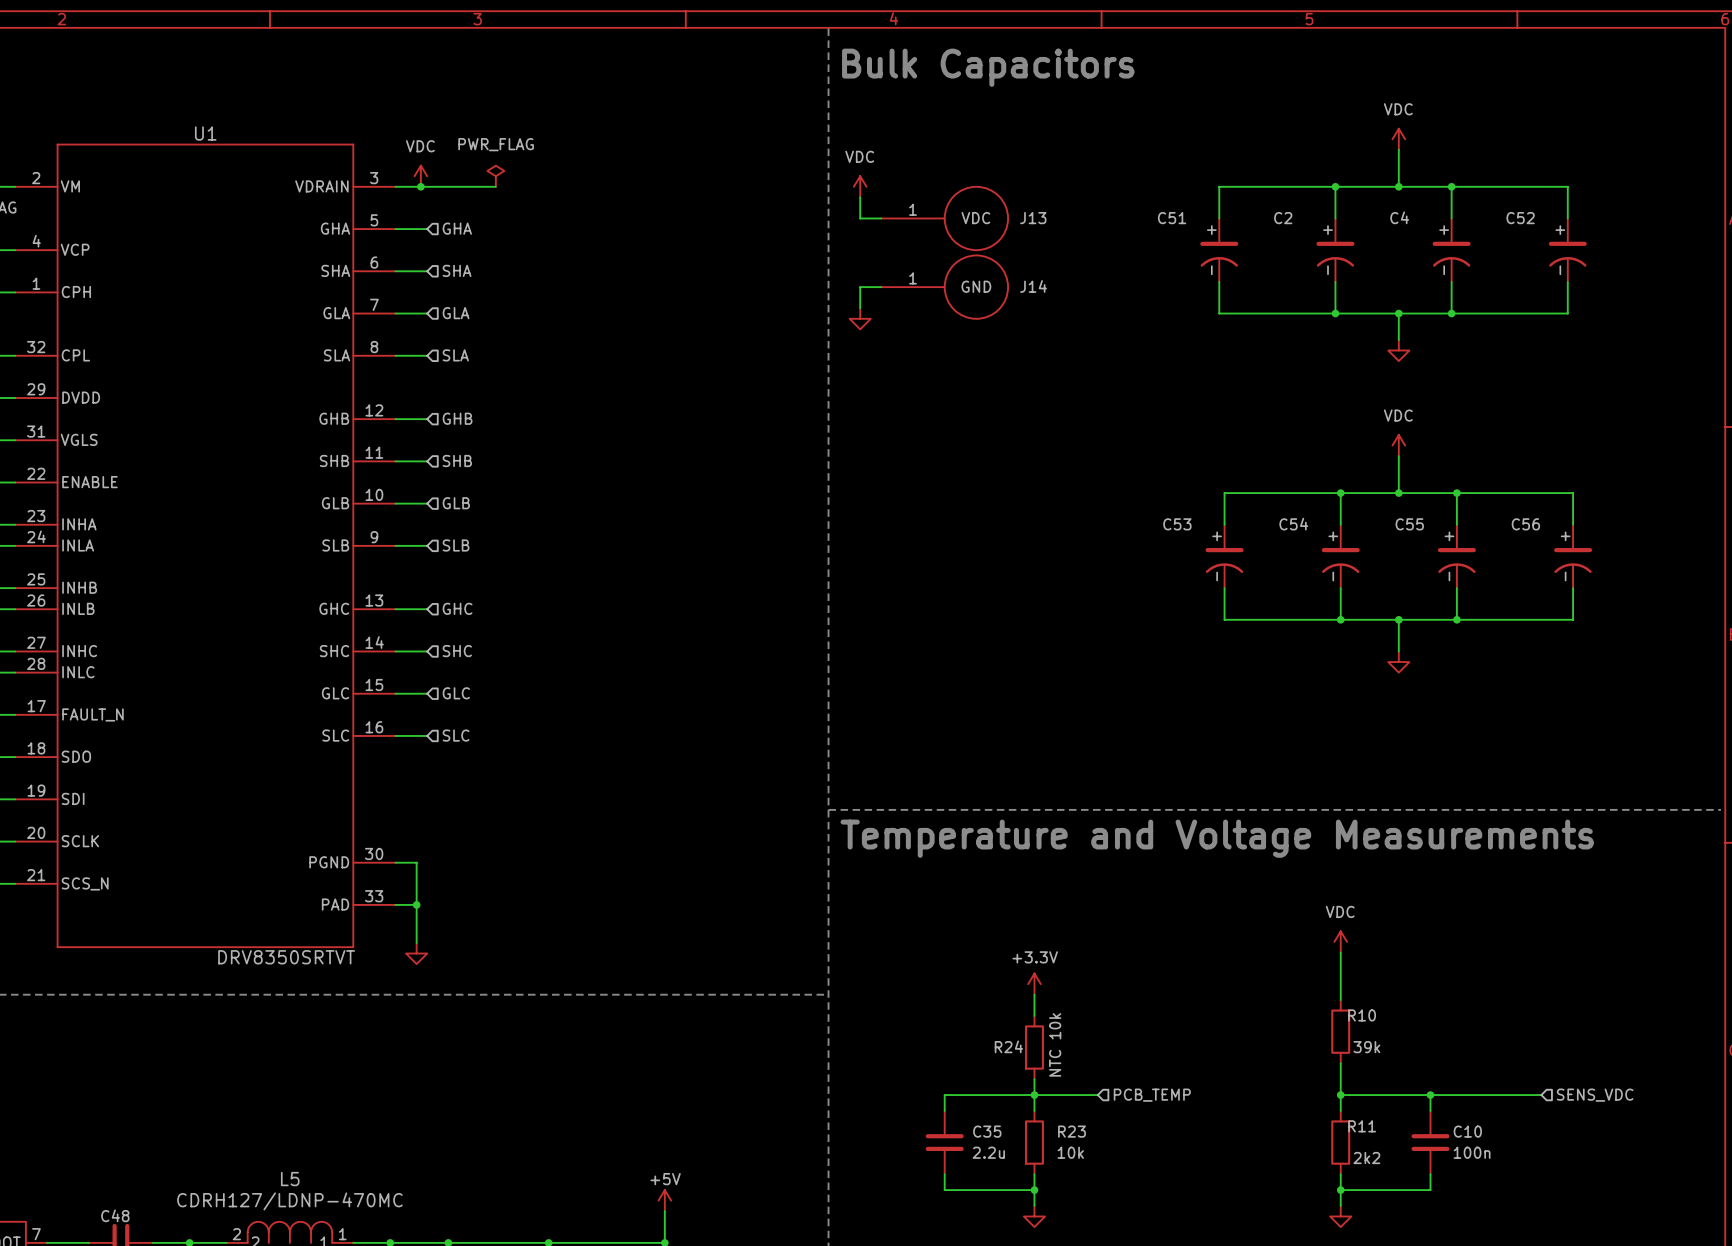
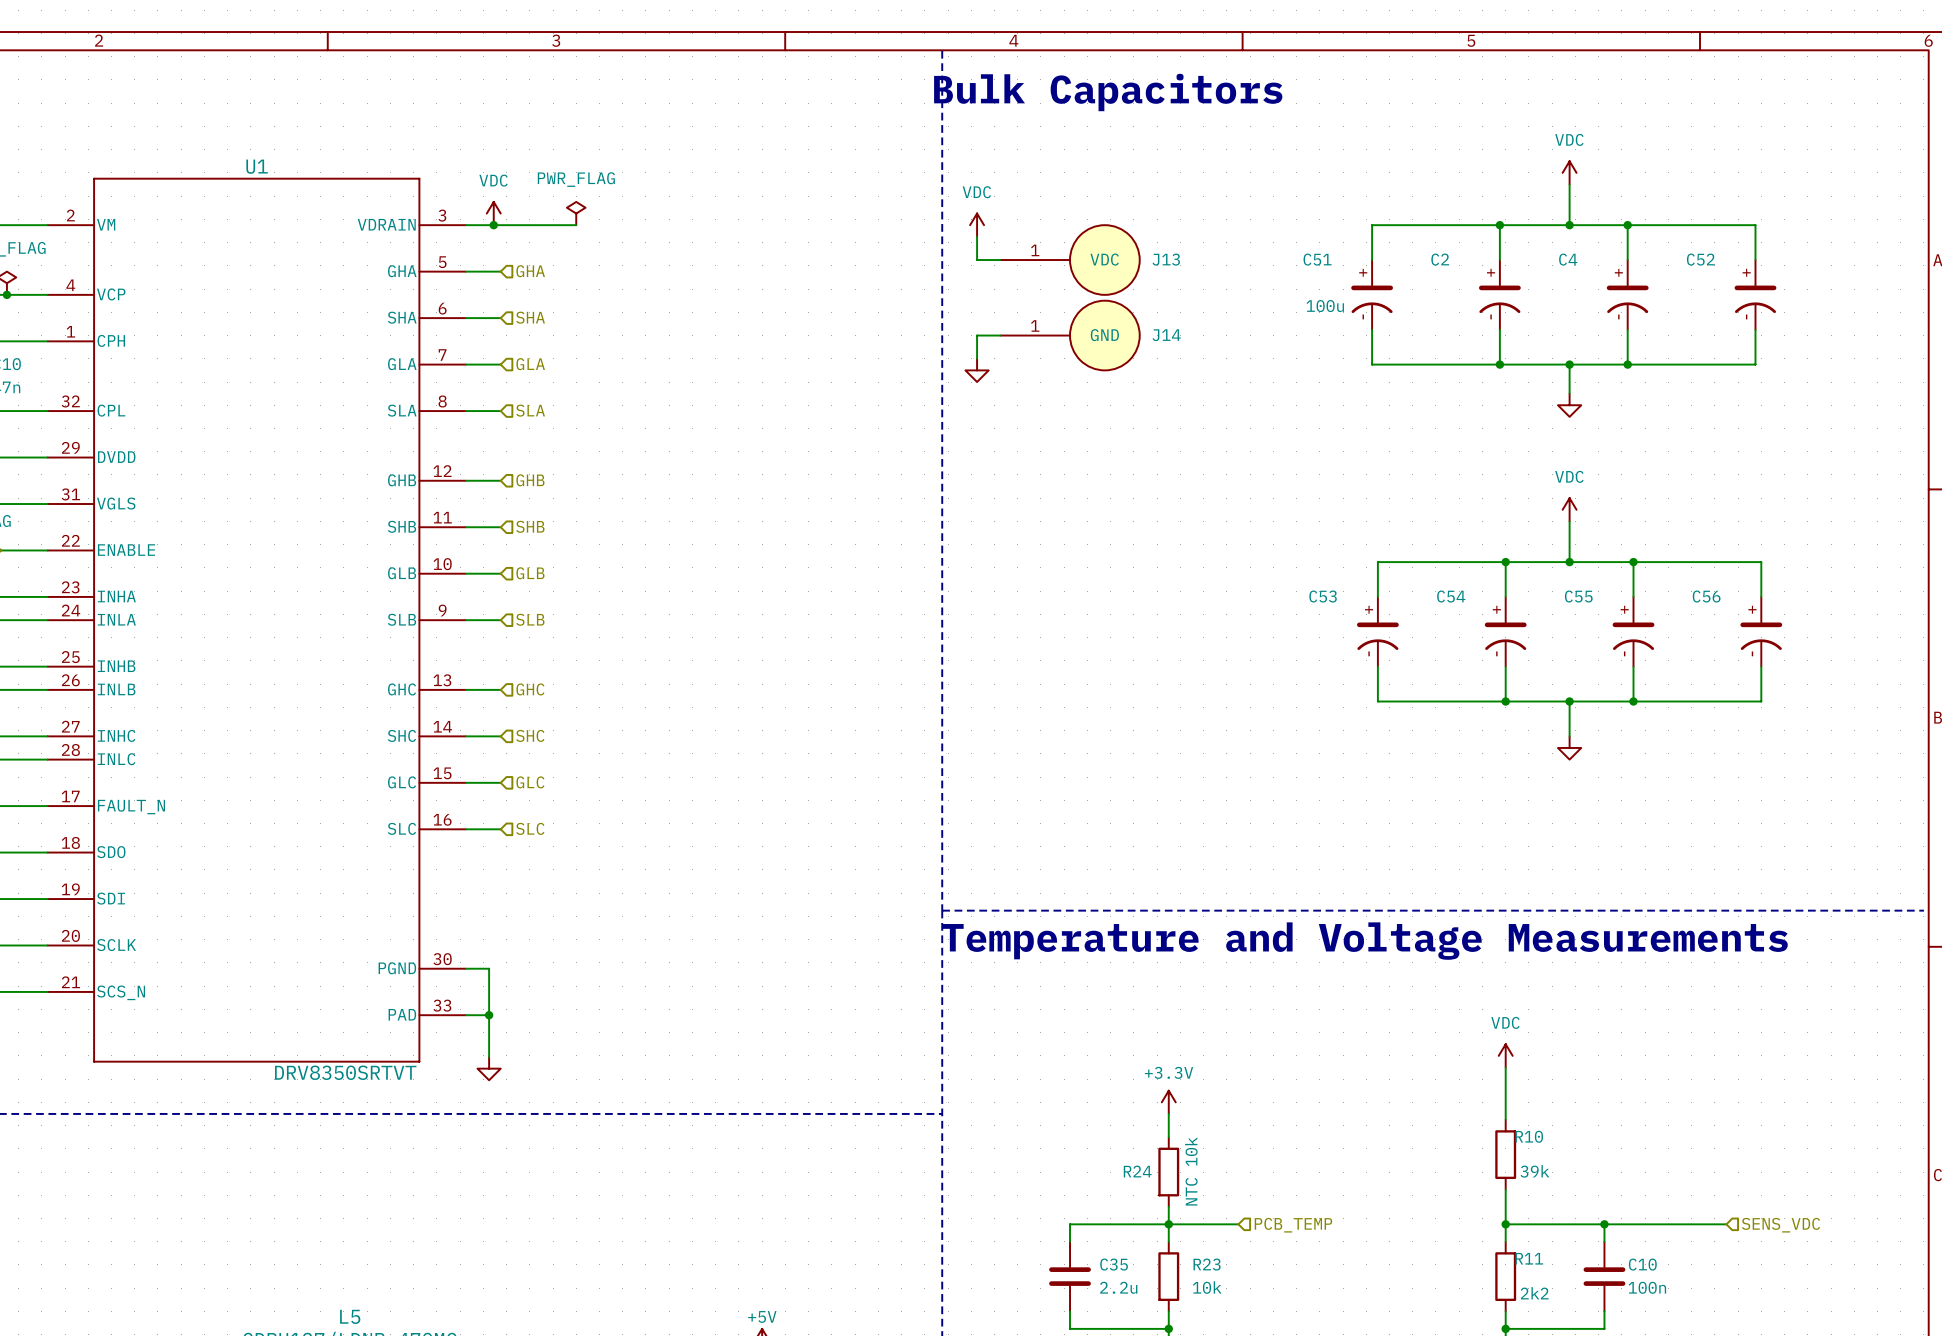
C51 text: none -> 100u (1325, 306)

